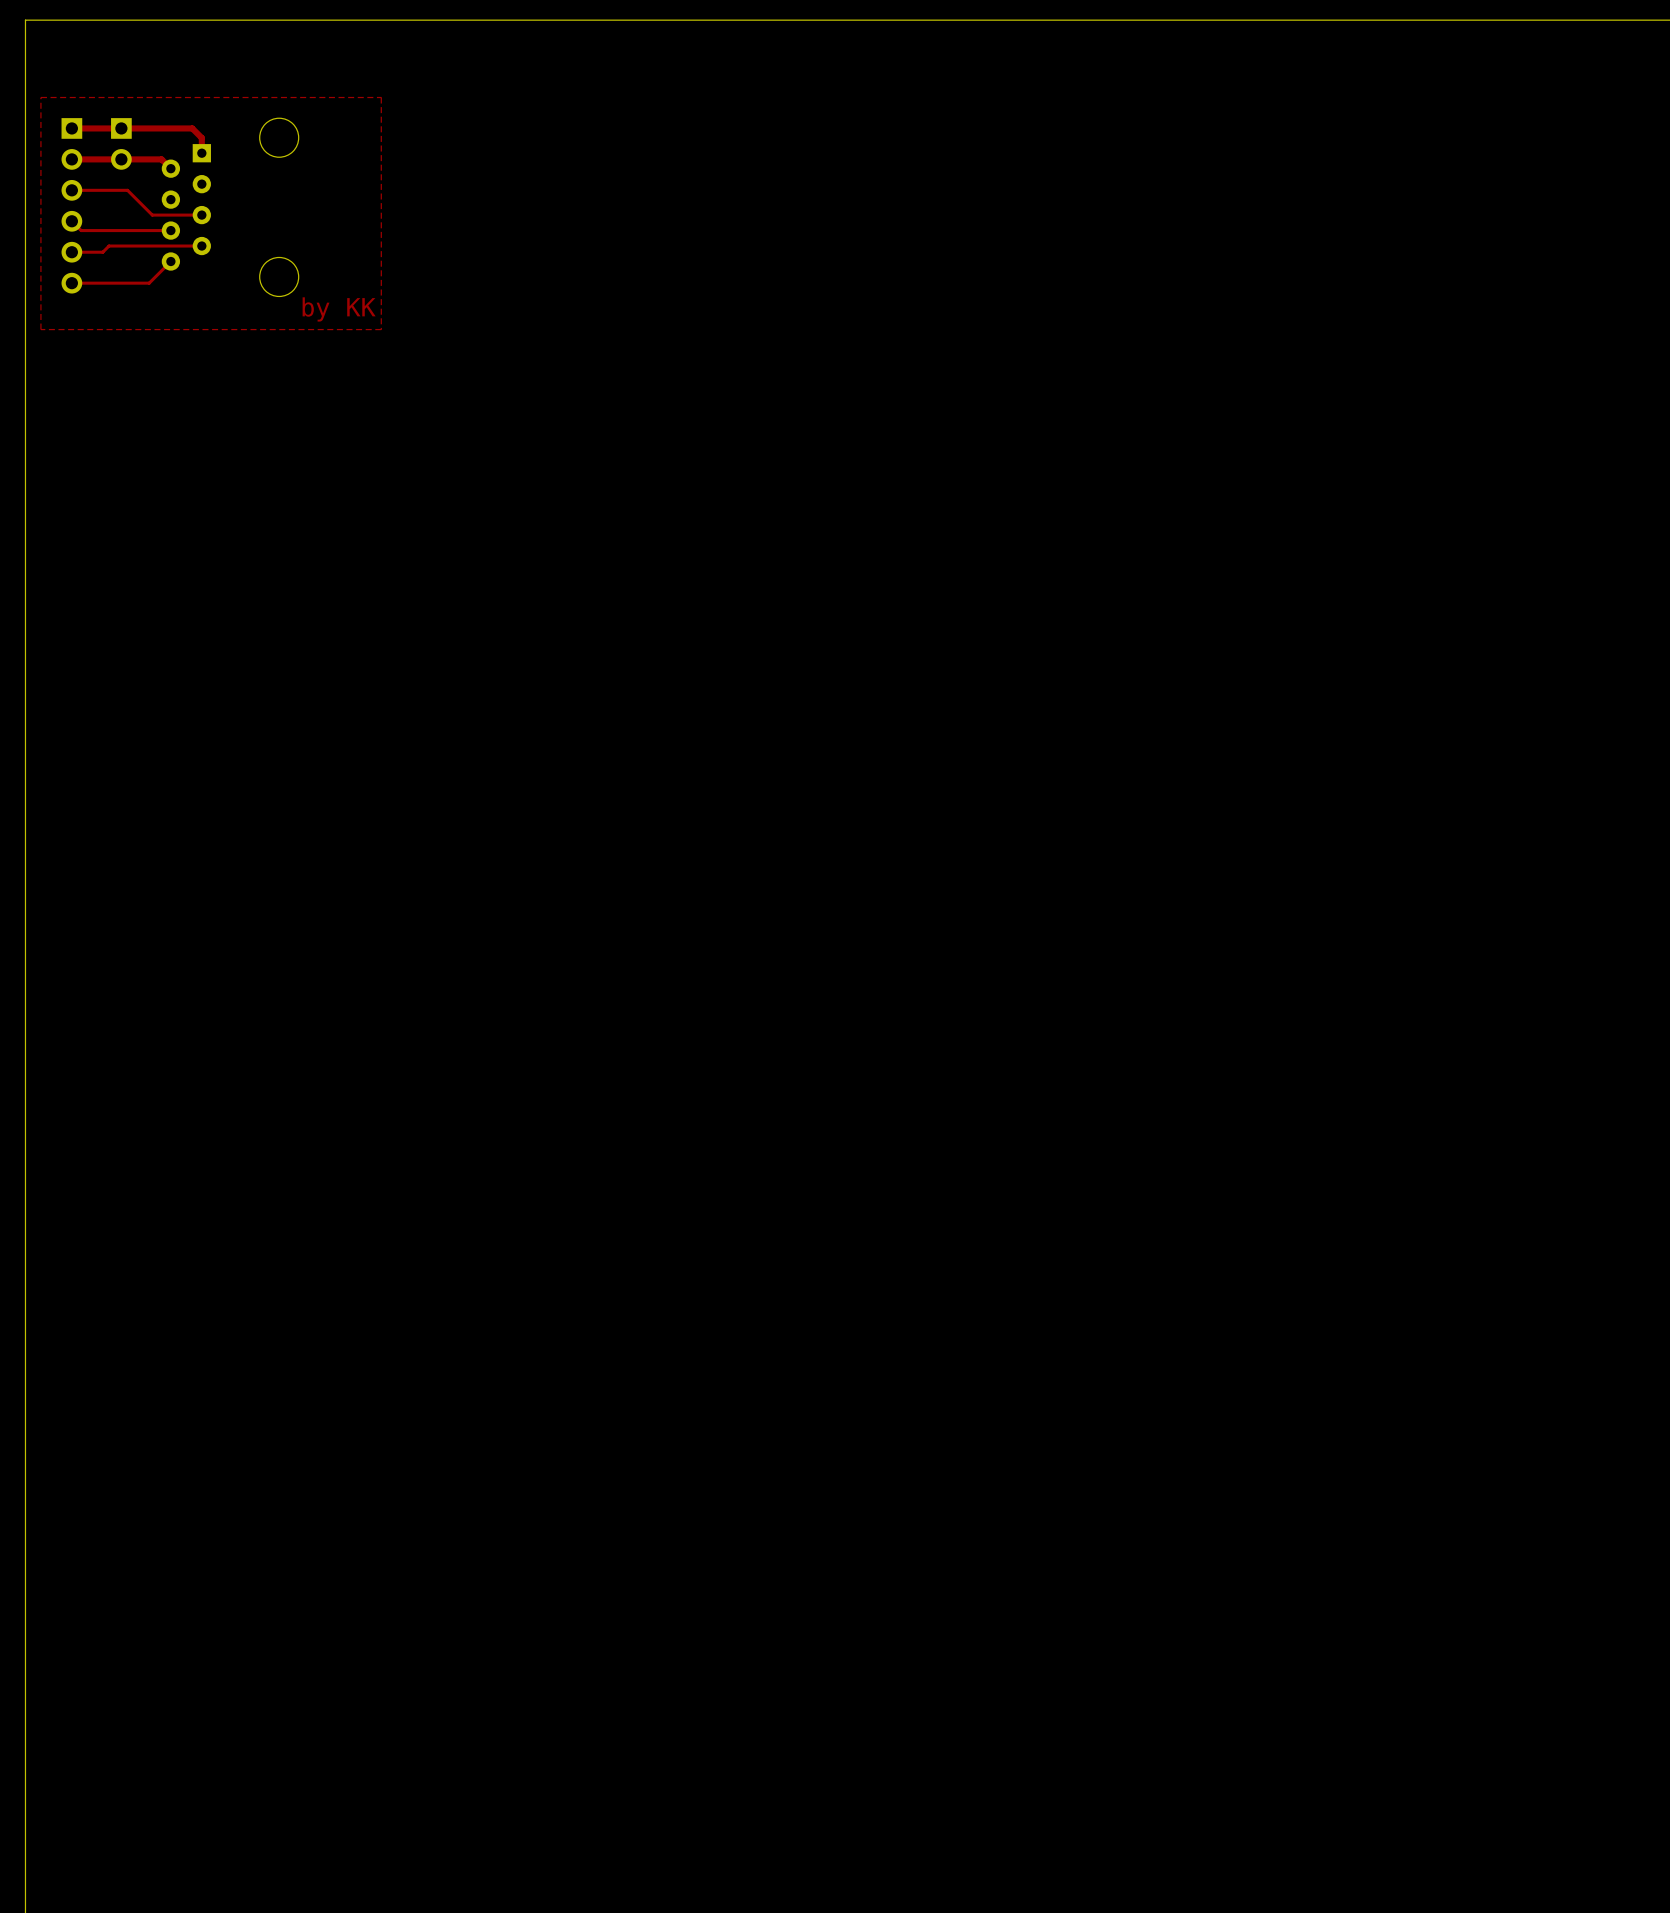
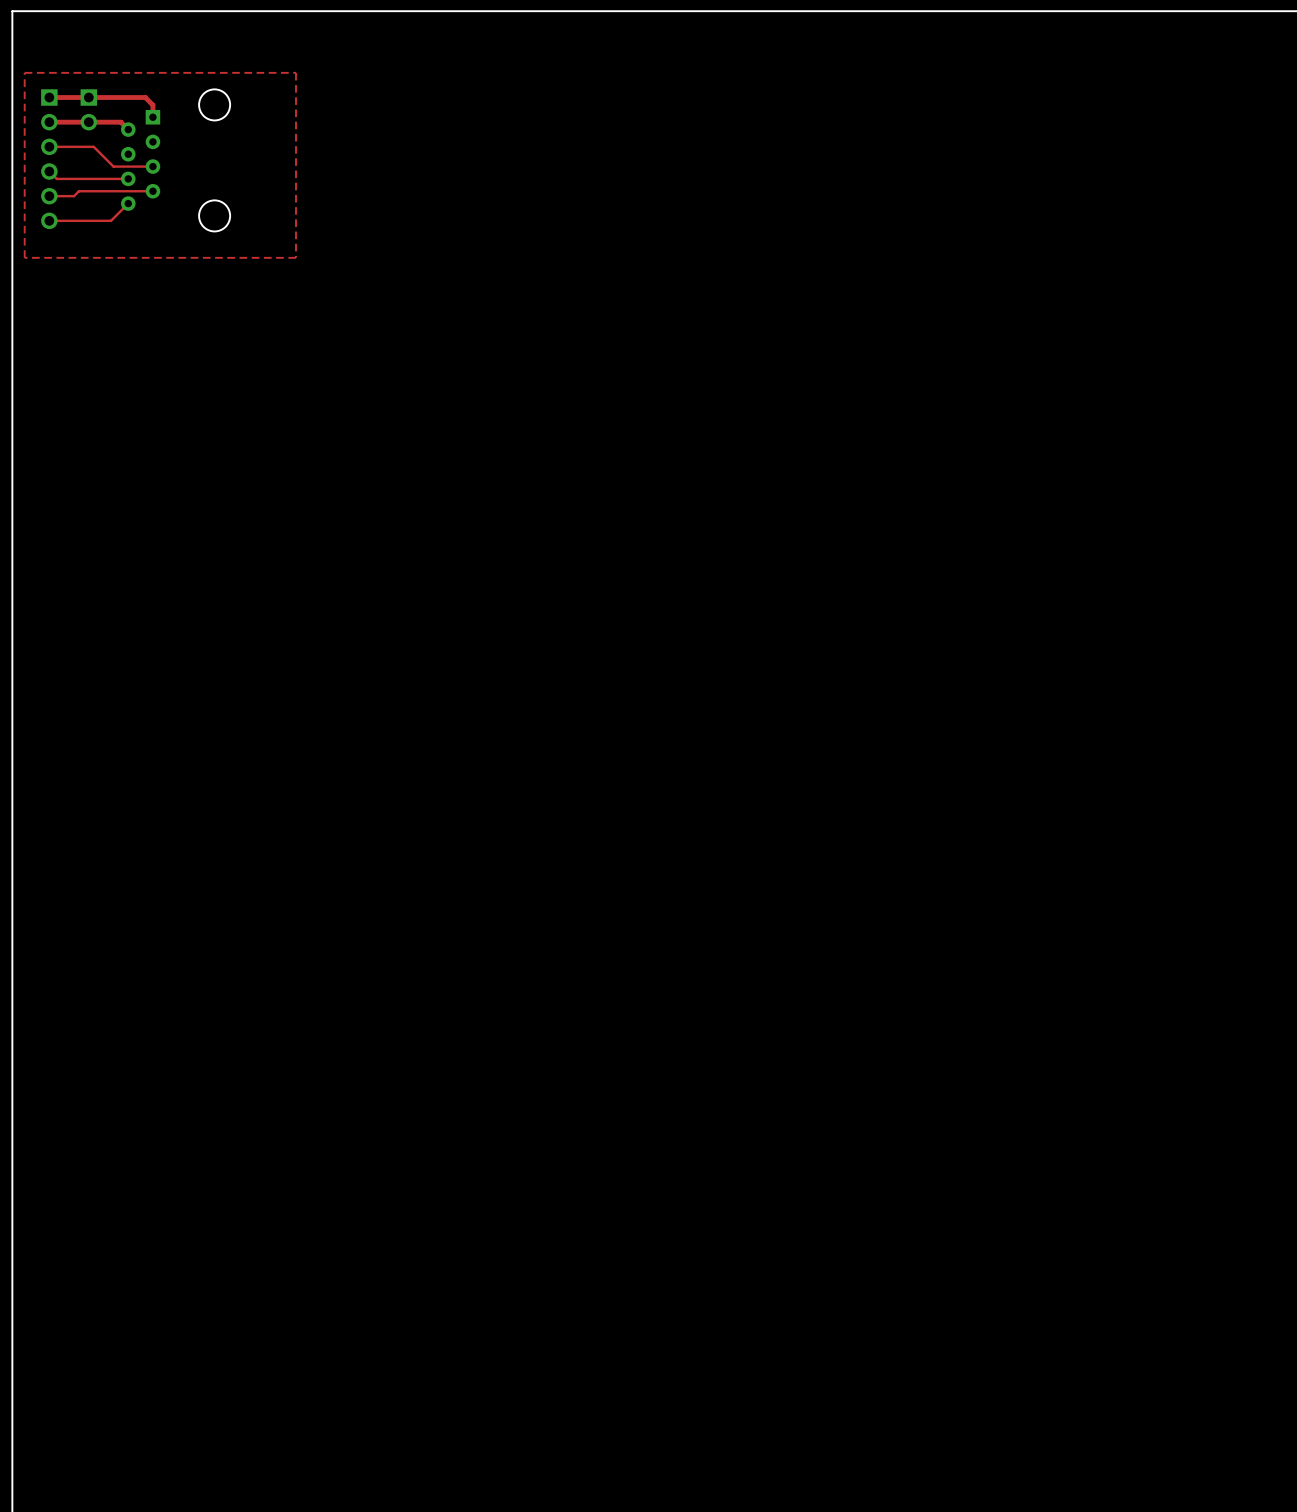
text: by KK (339, 309) -> none

